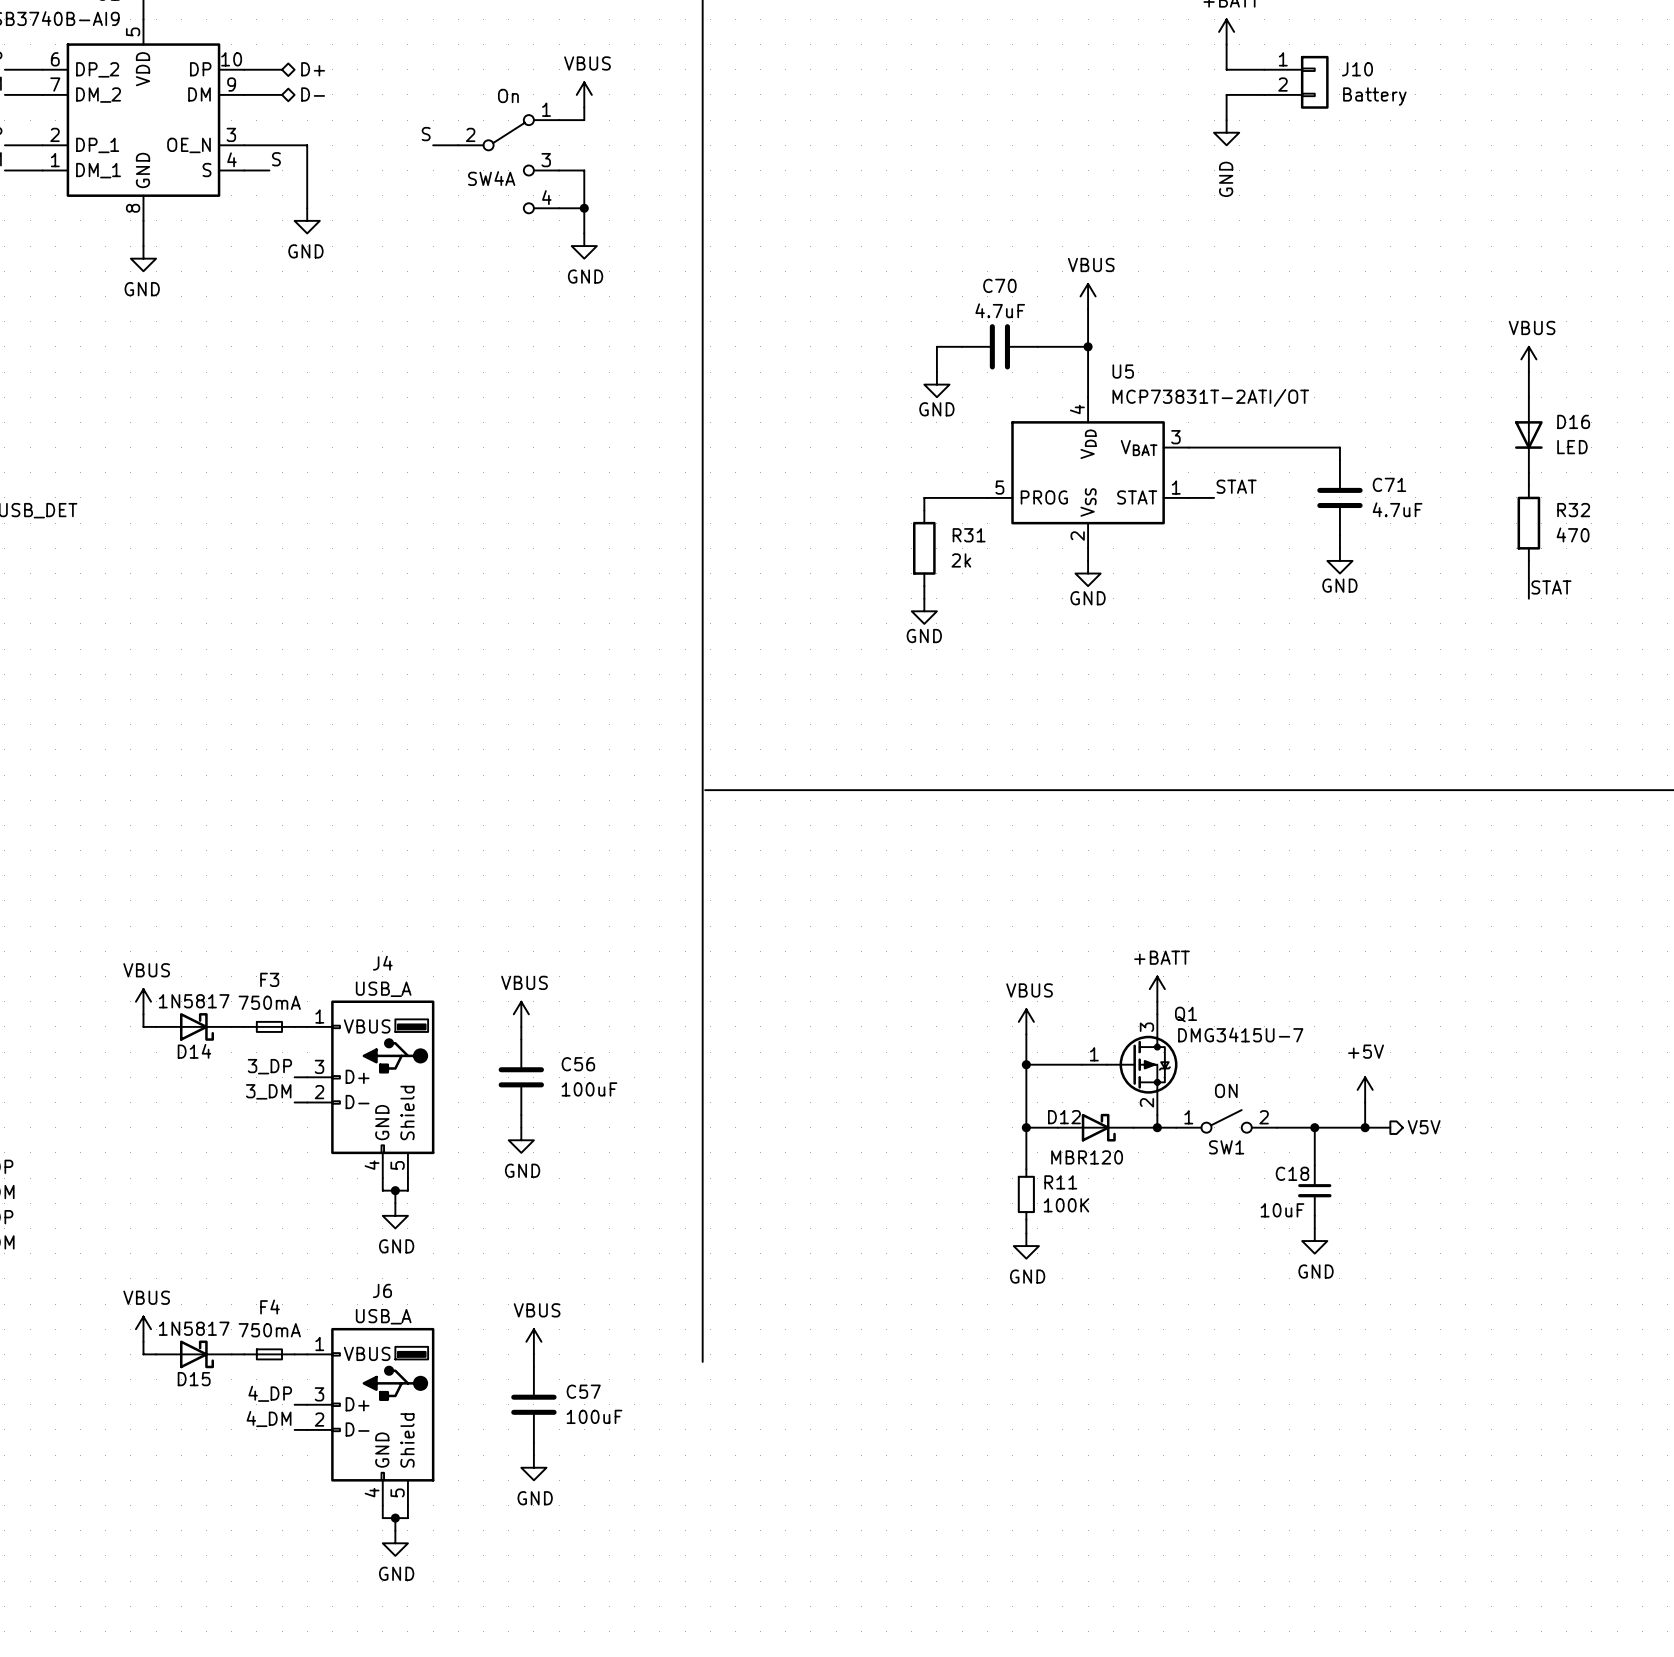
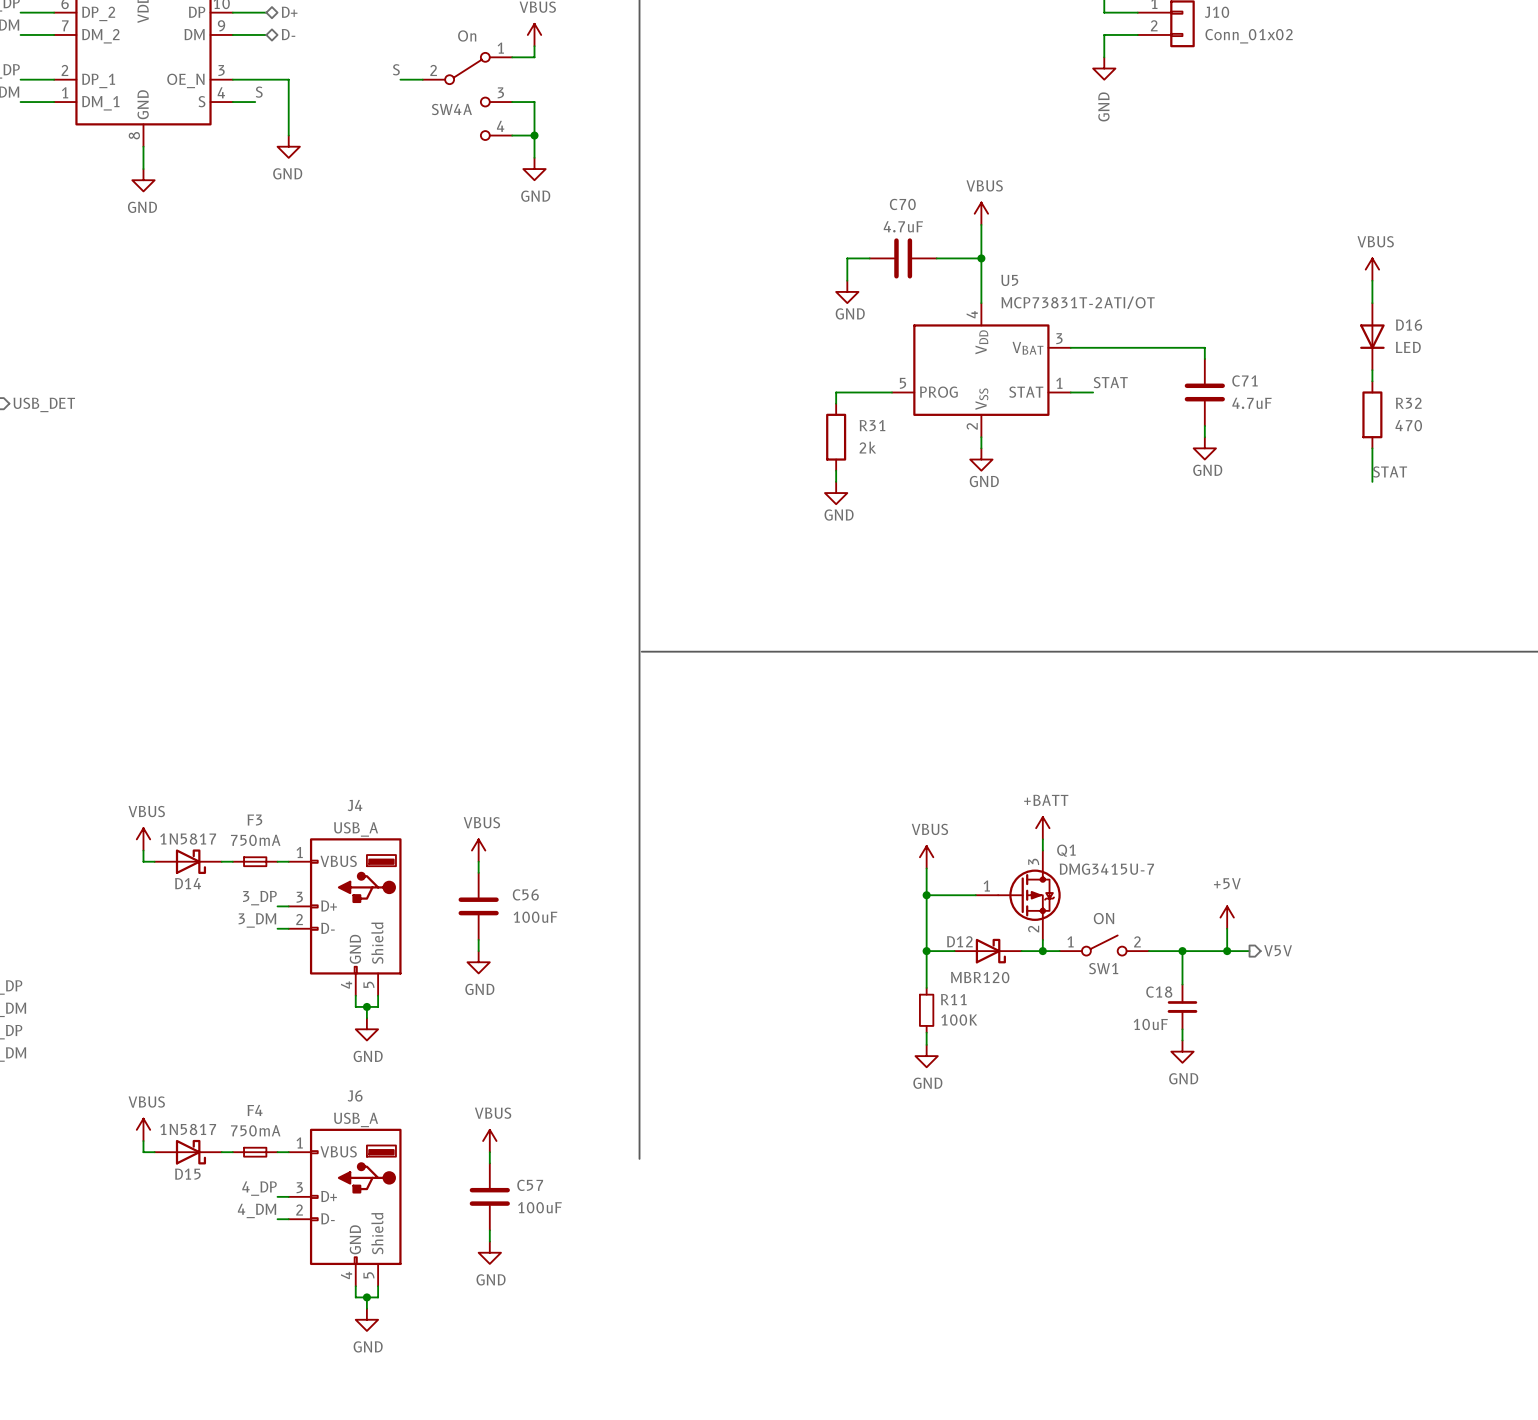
J10 value: Battery (1374, 96) -> Conn_01x02 (1249, 36)

